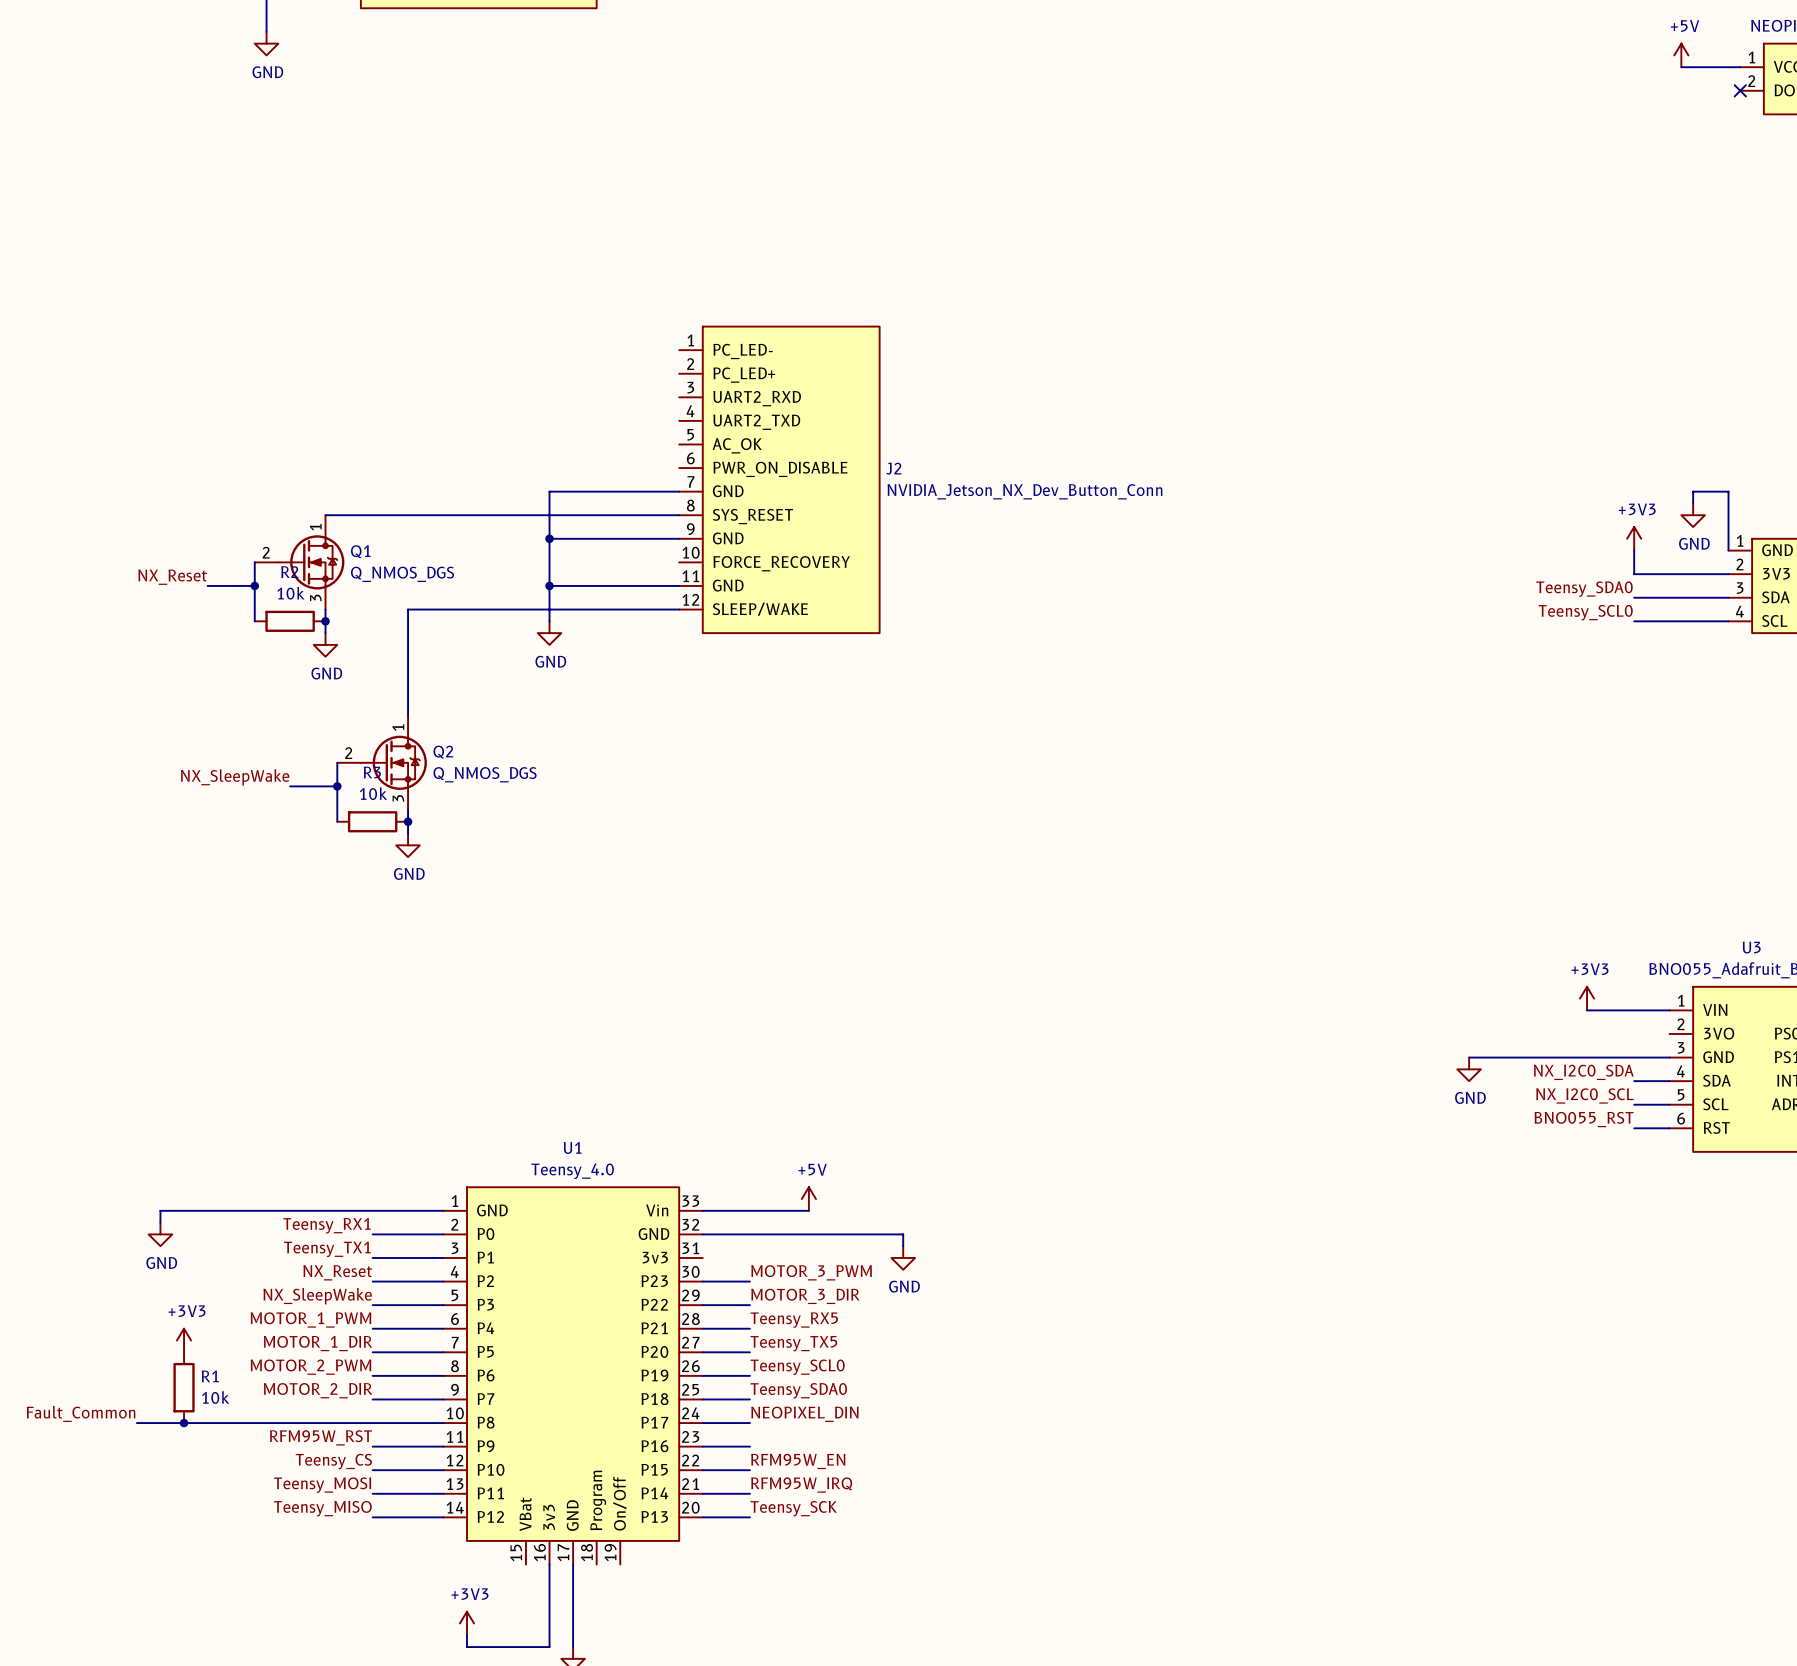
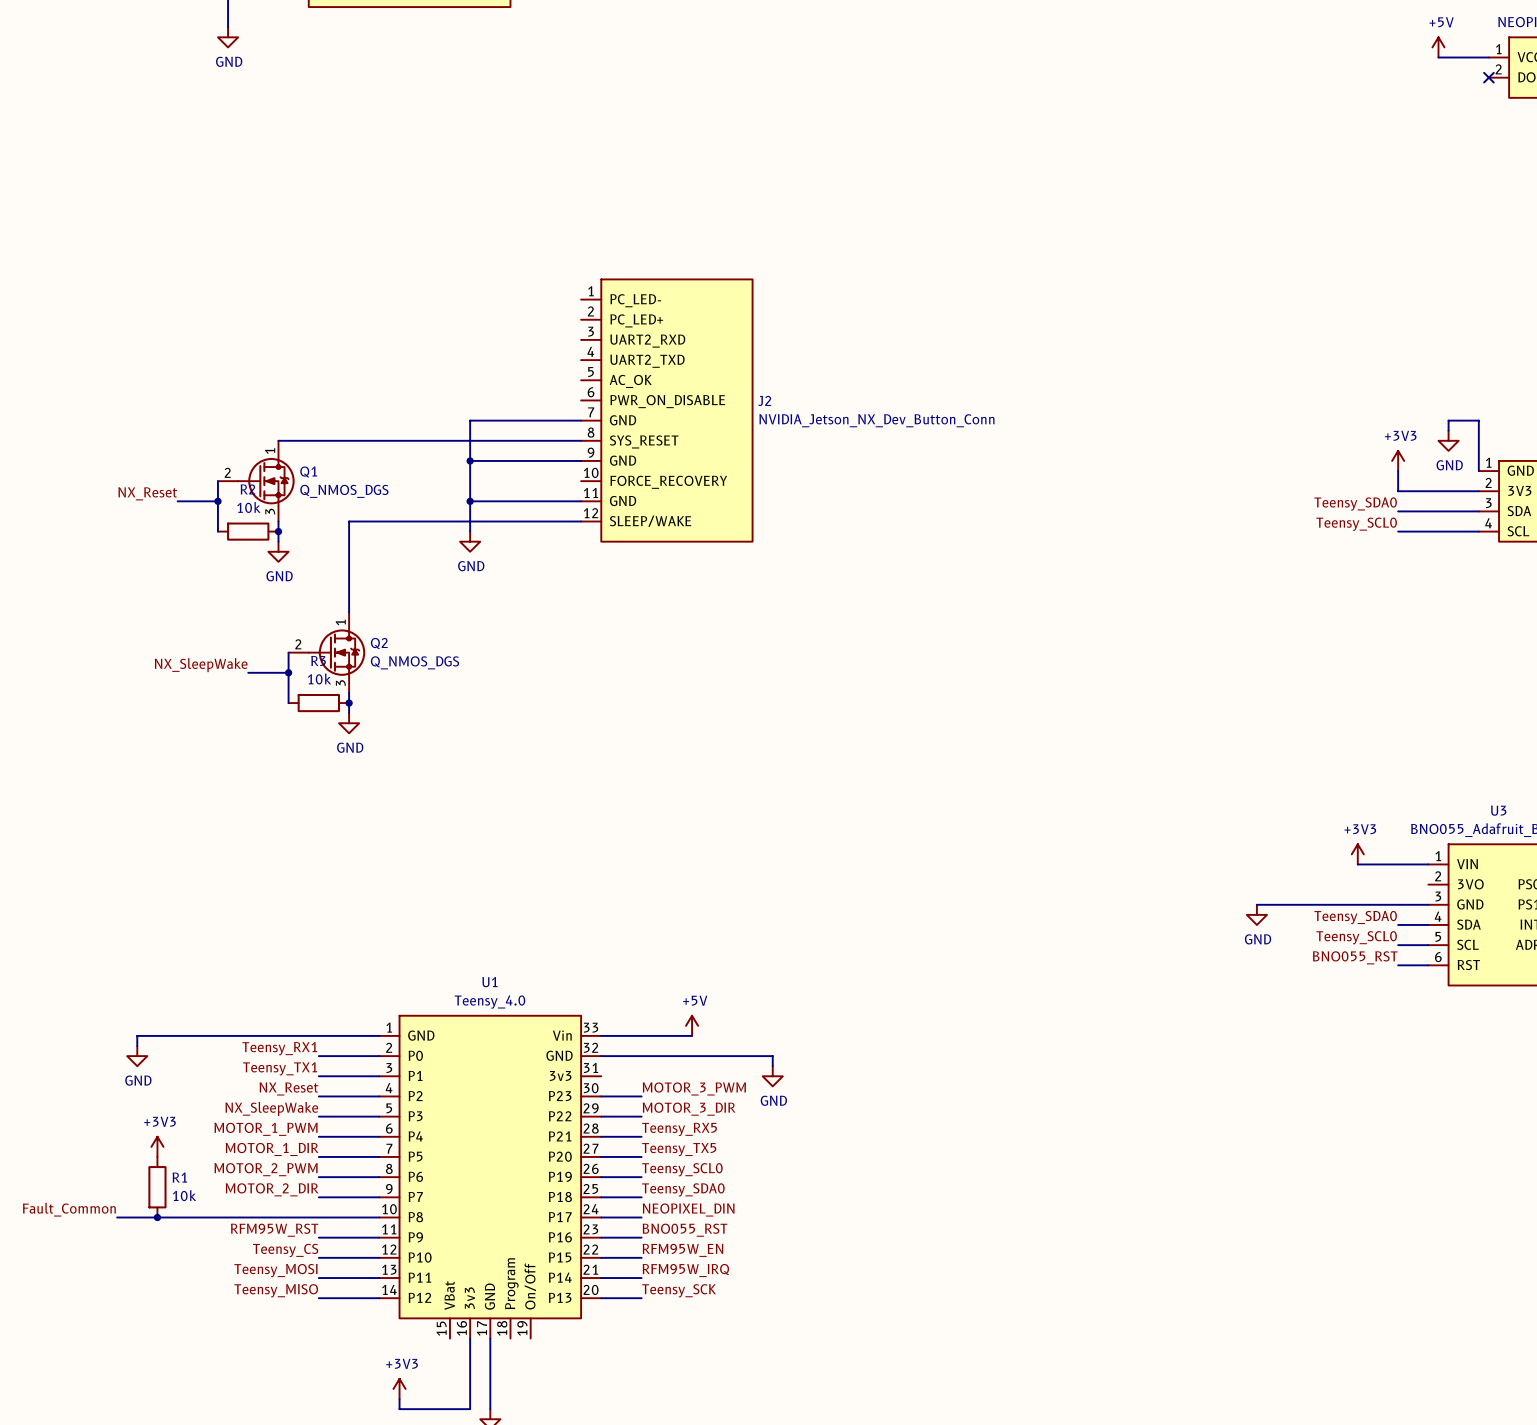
label: NX_I2C0_SDA (1583, 1072) -> Teensy_SDA0 (1355, 917)
label: NX_I2C0_SCL (1584, 1095) -> Teensy_SCL0 (1356, 937)
label: none -> BNO055_RST (685, 1230)

